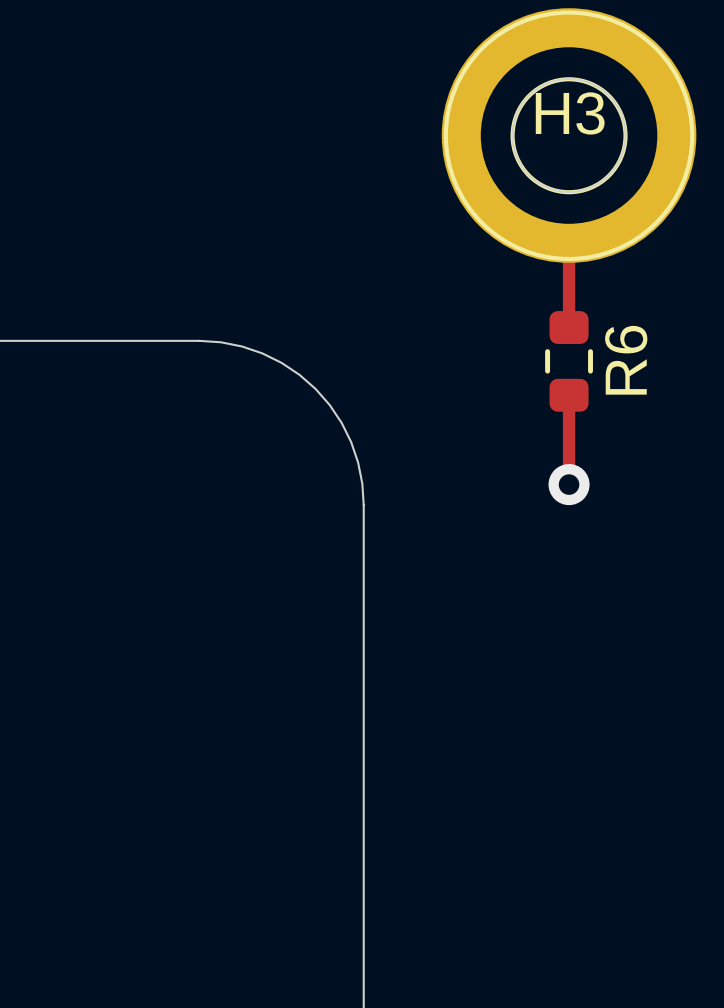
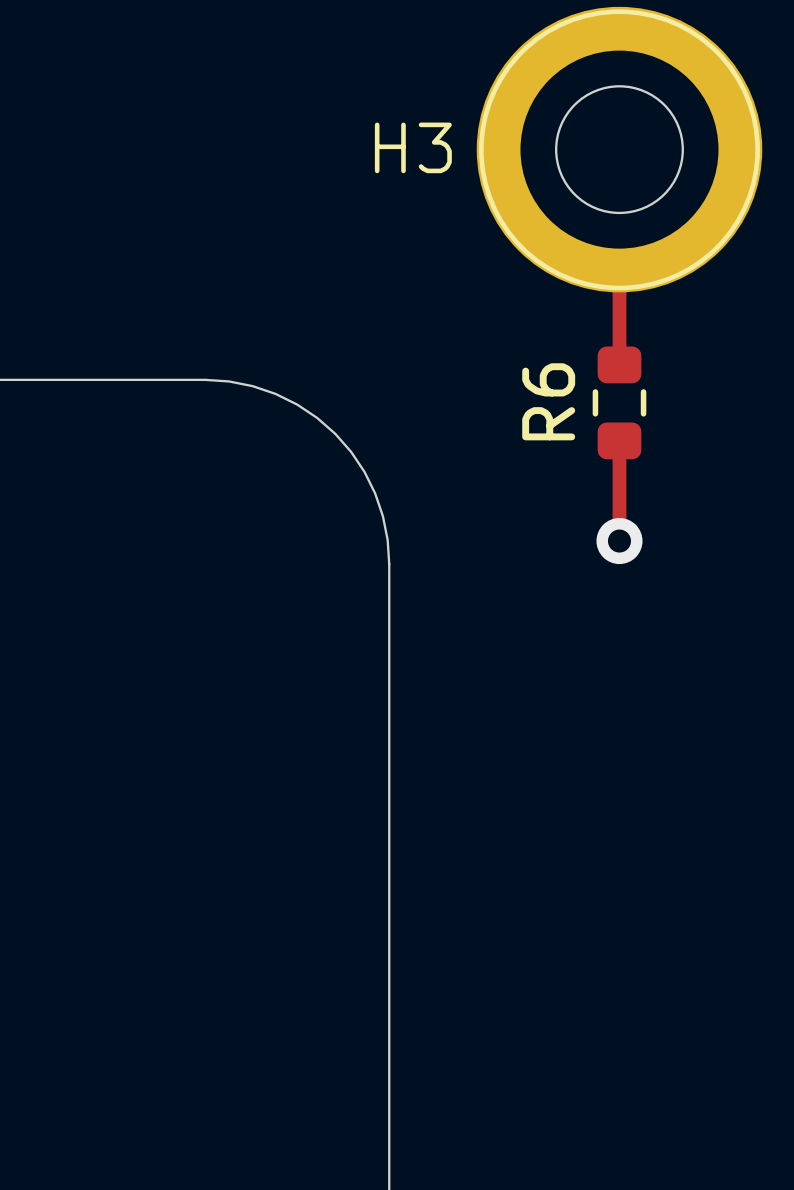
drawing: [510, 77, 628, 195] -> none
H3 name position: H3 (570, 113) -> H3 (413, 147)
R6 name position: R6 (626, 360) -> R6 (548, 401)

